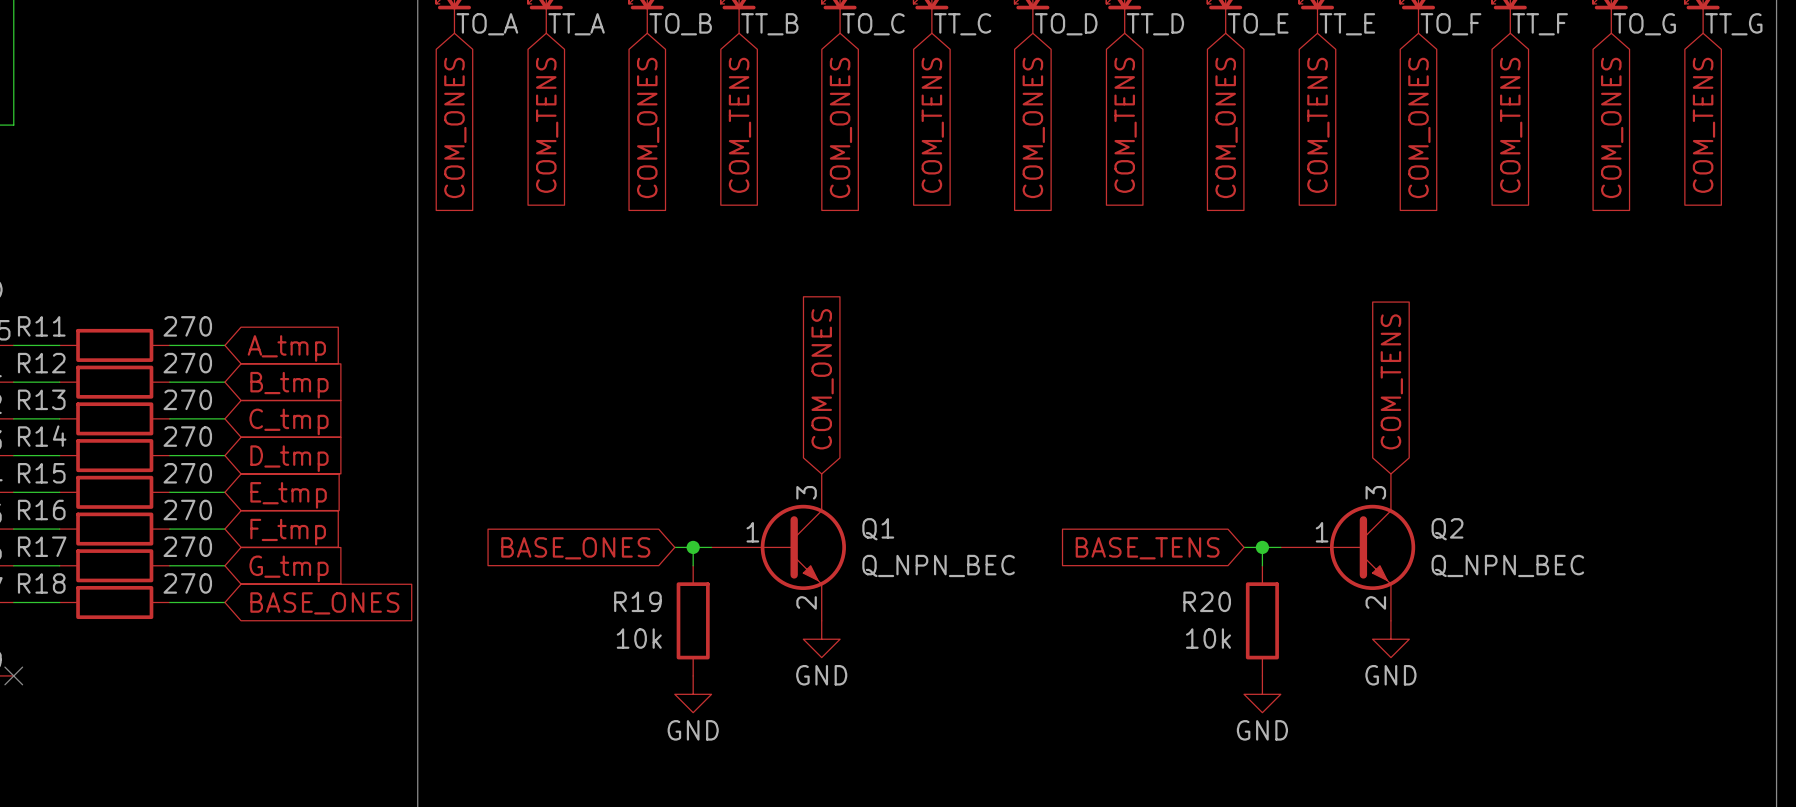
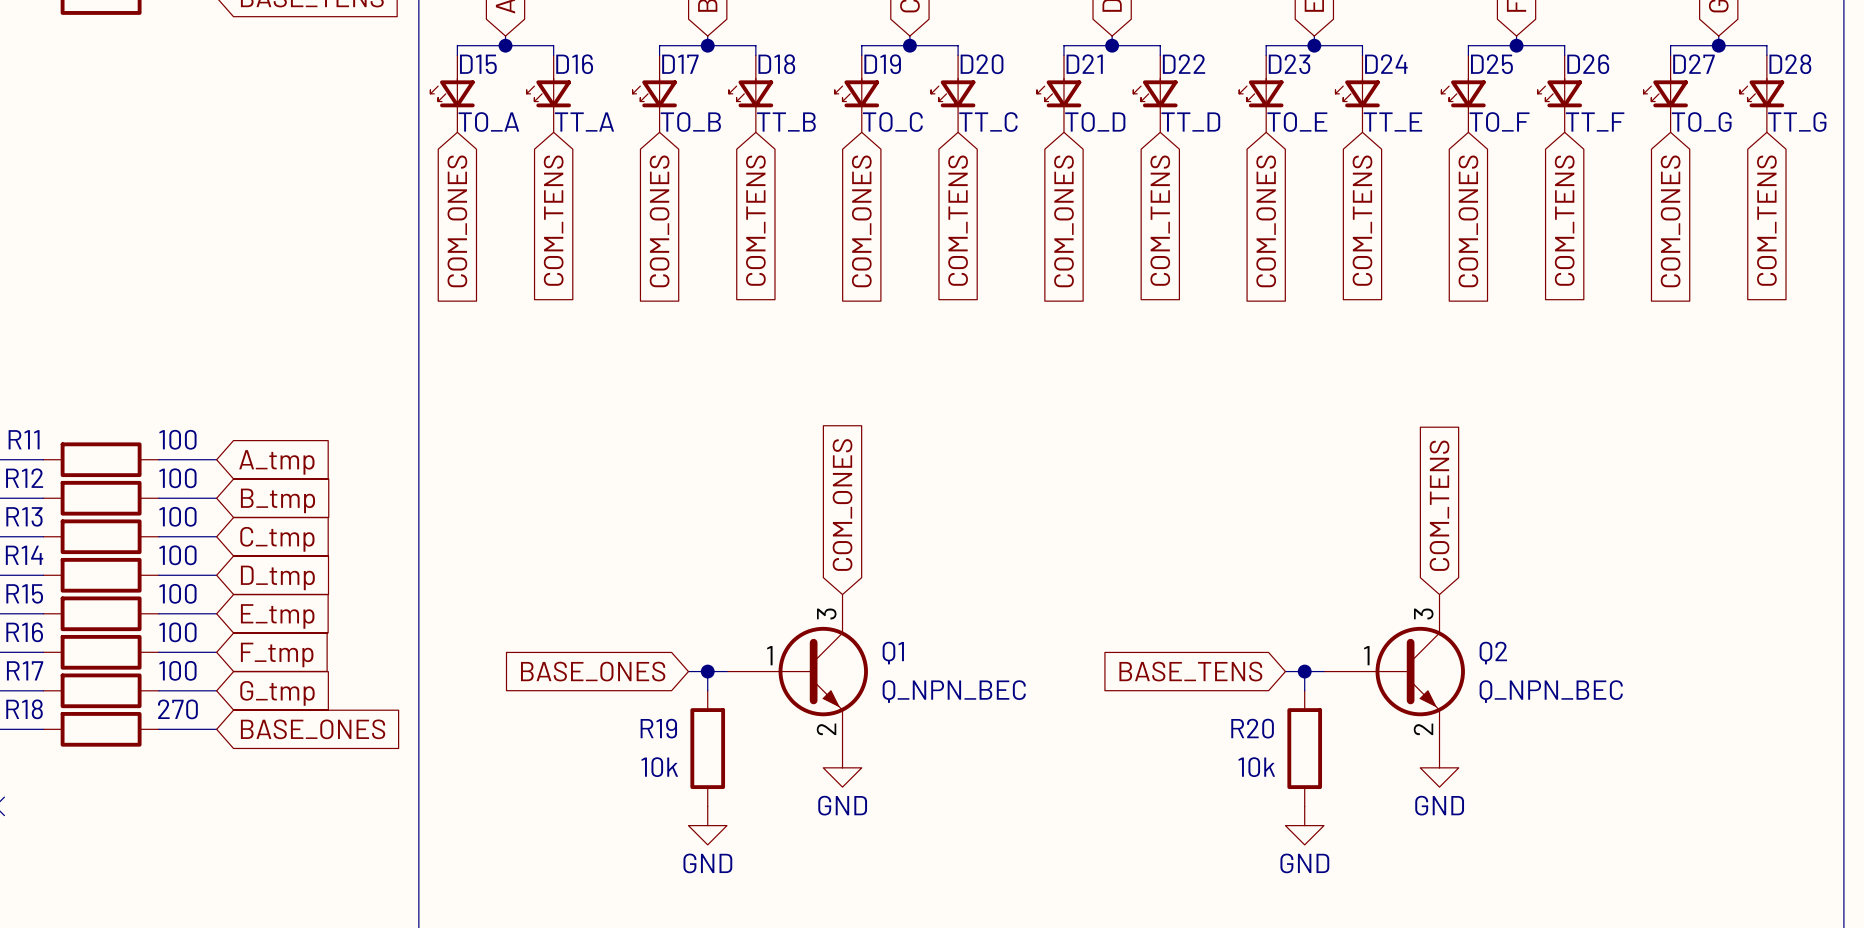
R11 value: 270 (187, 326) -> 100 (177, 439)
R12 value: 270 (187, 363) -> 100 (177, 478)
R13 value: 270 (187, 399) -> 100 (177, 516)
R14 value: 270 (187, 436) -> 100 (177, 555)
R15 value: 270 (187, 473) -> 100 (177, 593)
R16 value: 270 (187, 510) -> 100 (177, 632)
R17 value: 270 (187, 546) -> 100 (177, 670)

